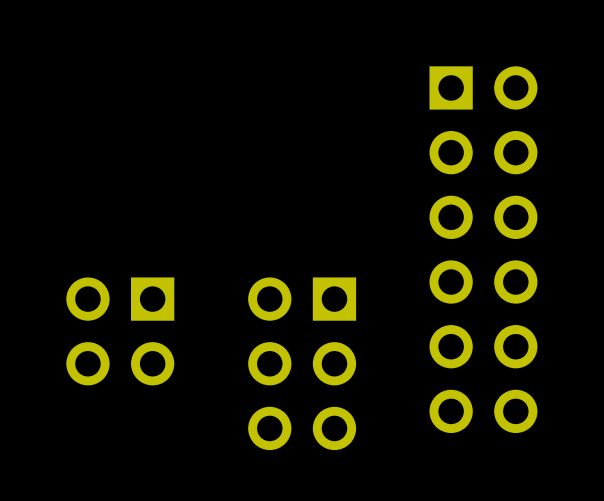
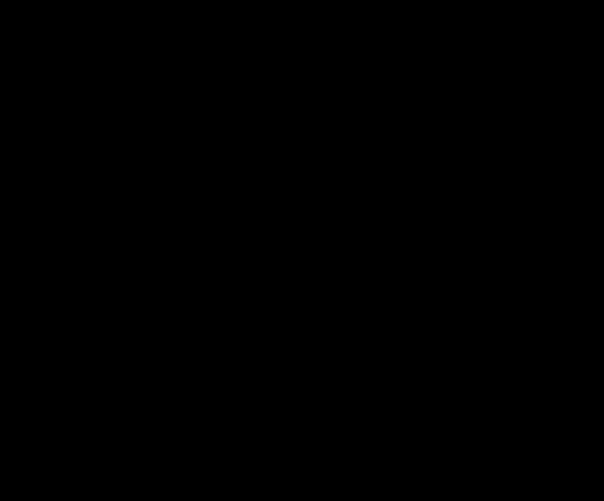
part: (483, 249) -> none
part: (120, 331) -> none
part: (302, 363) -> none

